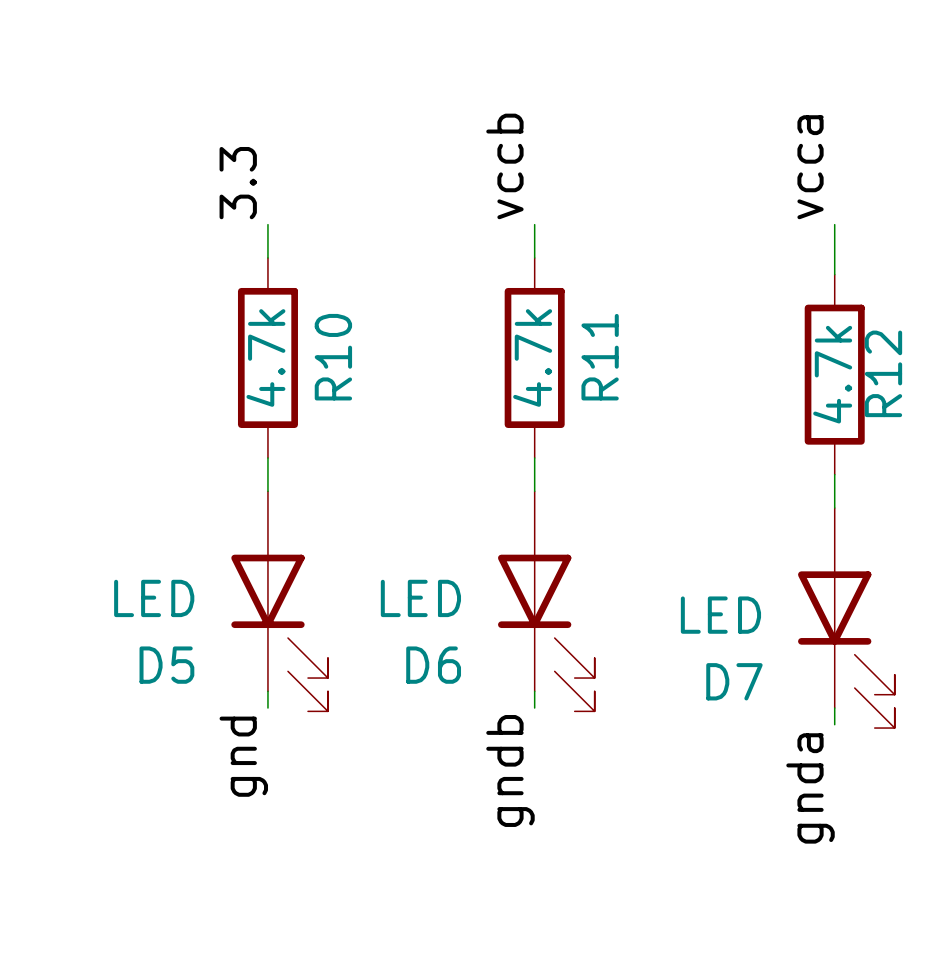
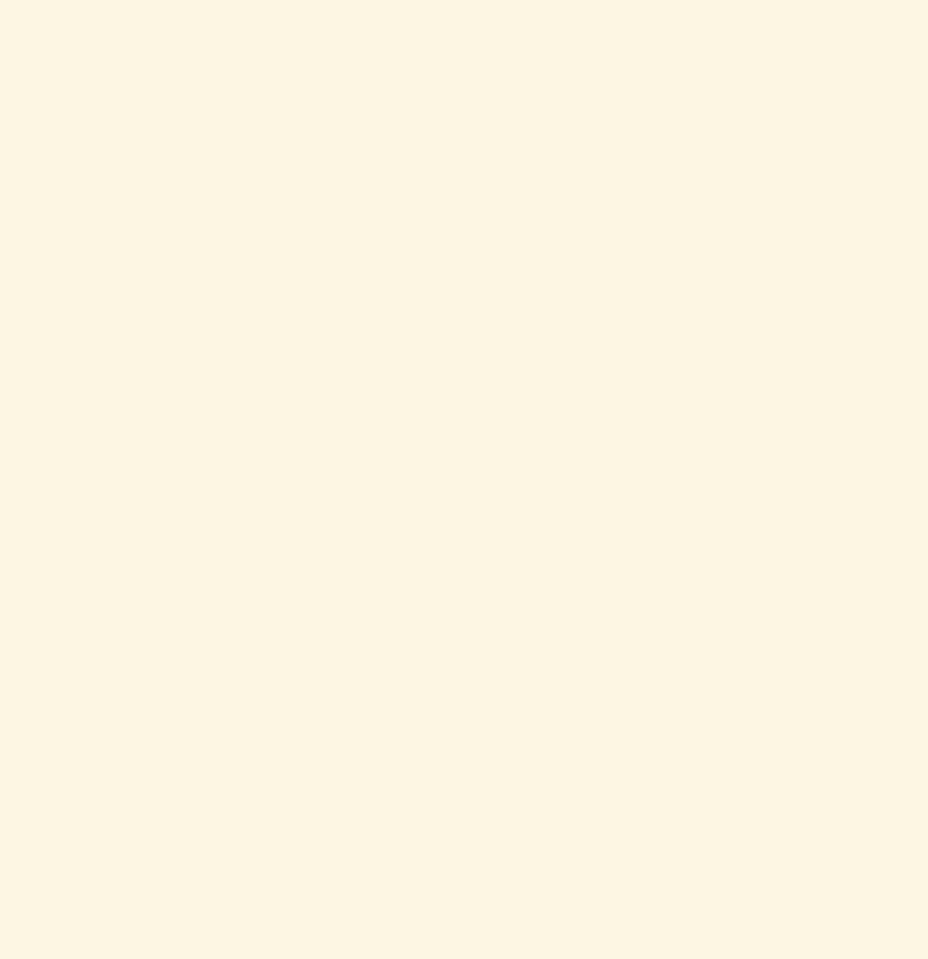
label: vccb (504, 166) -> none
label: vcca (810, 167) -> none
label: 3.3 (238, 183) -> none
wire: (267, 224) (267, 257) -> none
wire: (534, 224) (534, 257) -> none
wire: (834, 224) (834, 274) -> none
R10: 4.7k (267, 357) -> none
R11: 4.7k (534, 357) -> none
R12: 4.7k (834, 374) -> none
wire: (267, 458) (267, 491) -> none
wire: (534, 458) (534, 491) -> none
wire: (834, 474) (834, 508) -> none
D5: LED (279, 601) -> none
D6: LED (546, 601) -> none
D7: LED (846, 618) -> none
wire: (267, 691) (267, 708) -> none
wire: (534, 691) (534, 708) -> none
wire: (834, 708) (834, 724) -> none
label: gnd (243, 756) -> none
label: gndb (510, 770) -> none
label: gnda (810, 788) -> none

